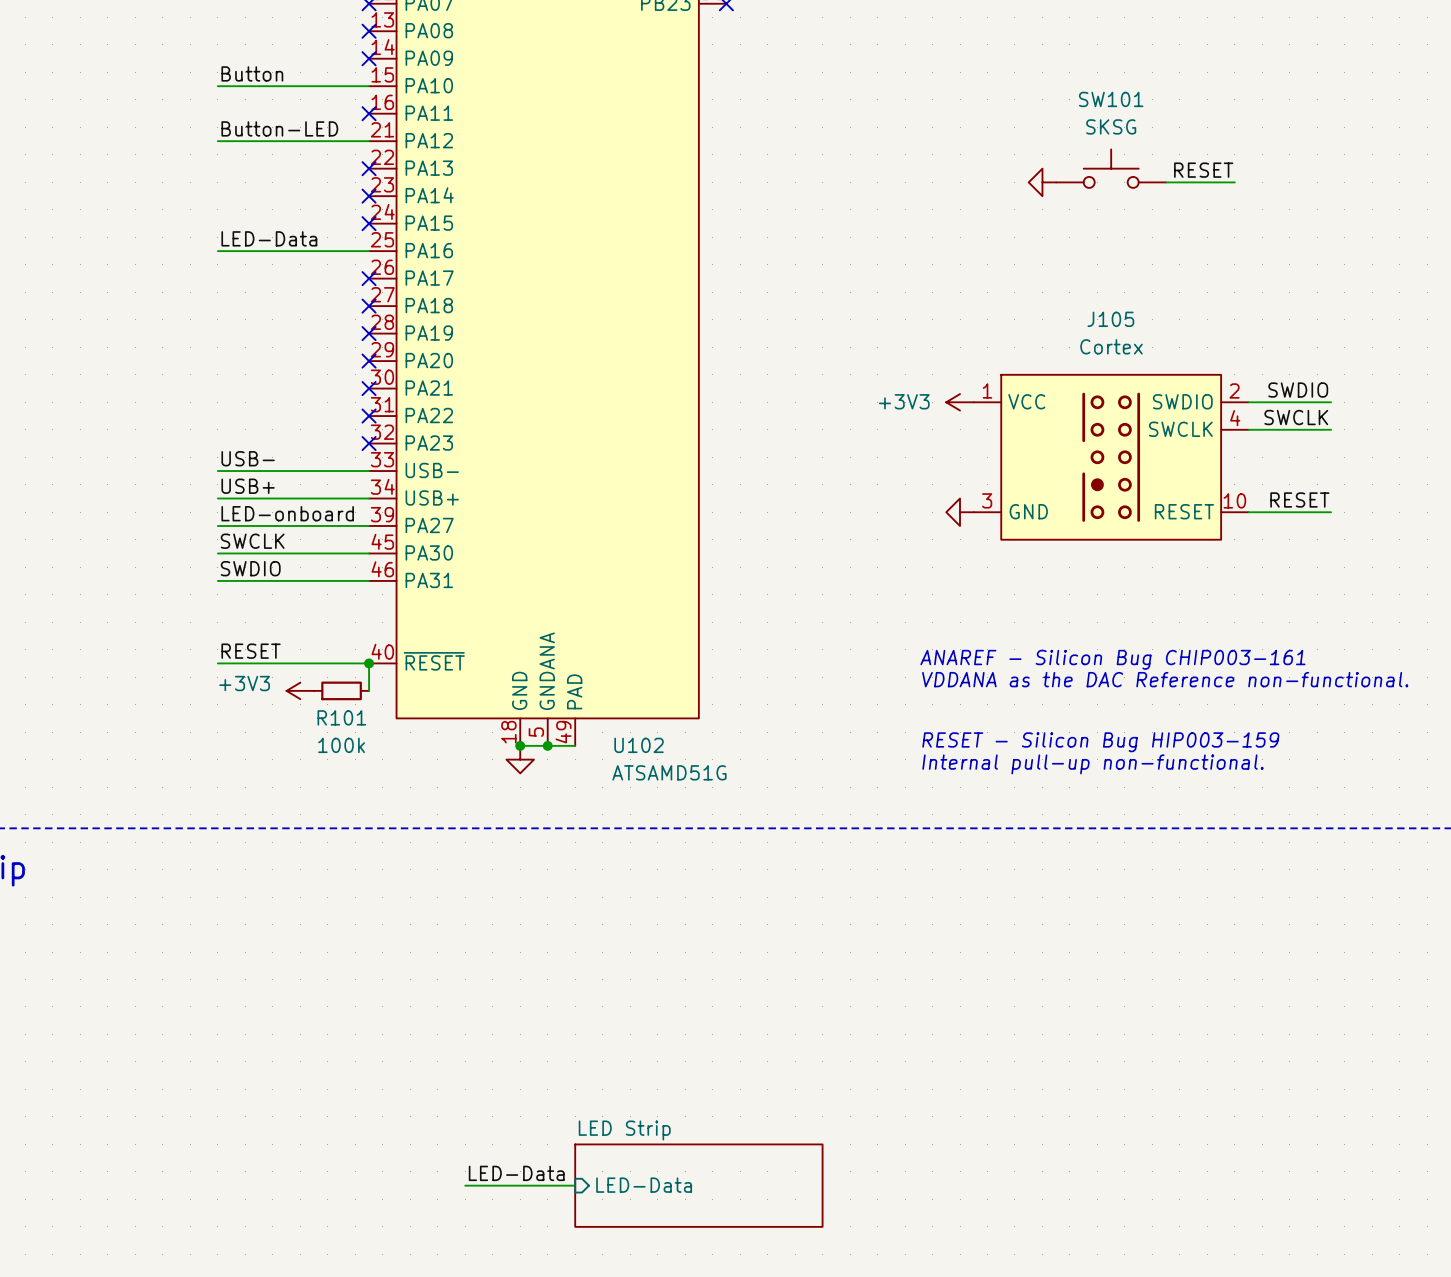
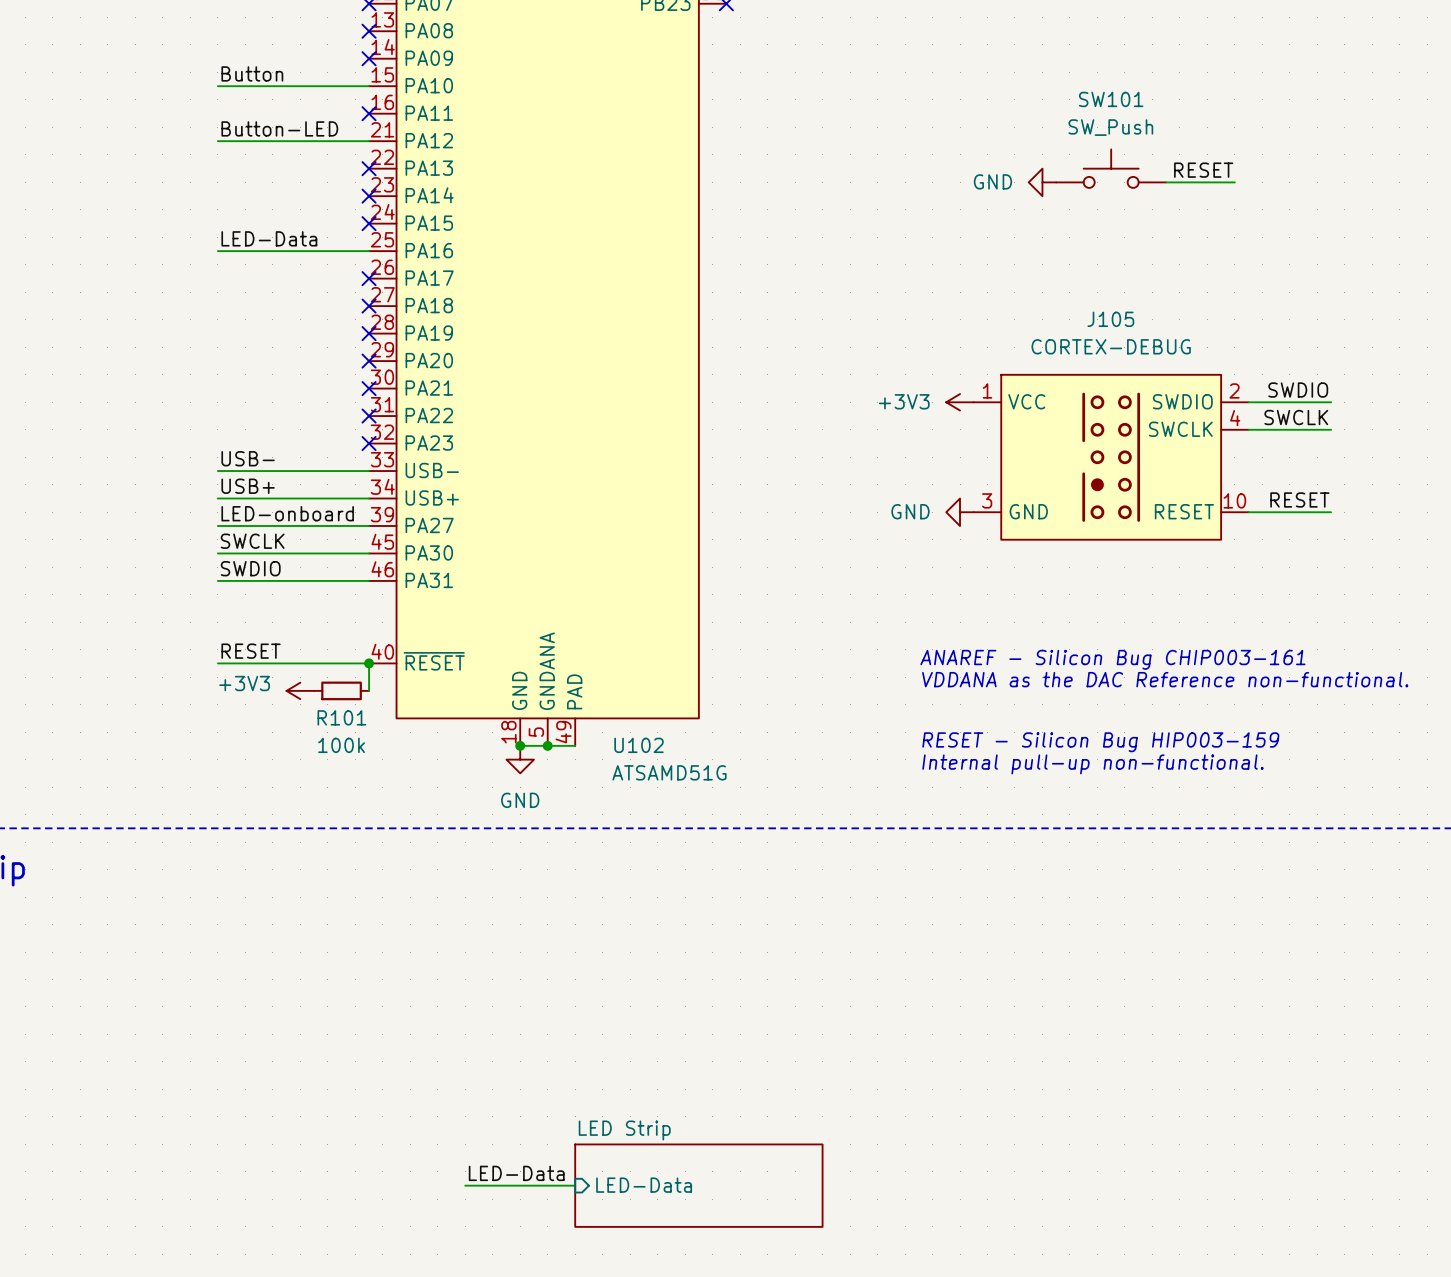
SW101 value: SKSG (1111, 126) -> SW_Push (1110, 127)
power symbol text: none -> GND (992, 181)
J105 value: Cortex (1111, 346) -> CORTEX-DEBUG (1111, 346)
power symbol text: none -> GND (910, 511)
power symbol text: none -> GND (520, 800)

